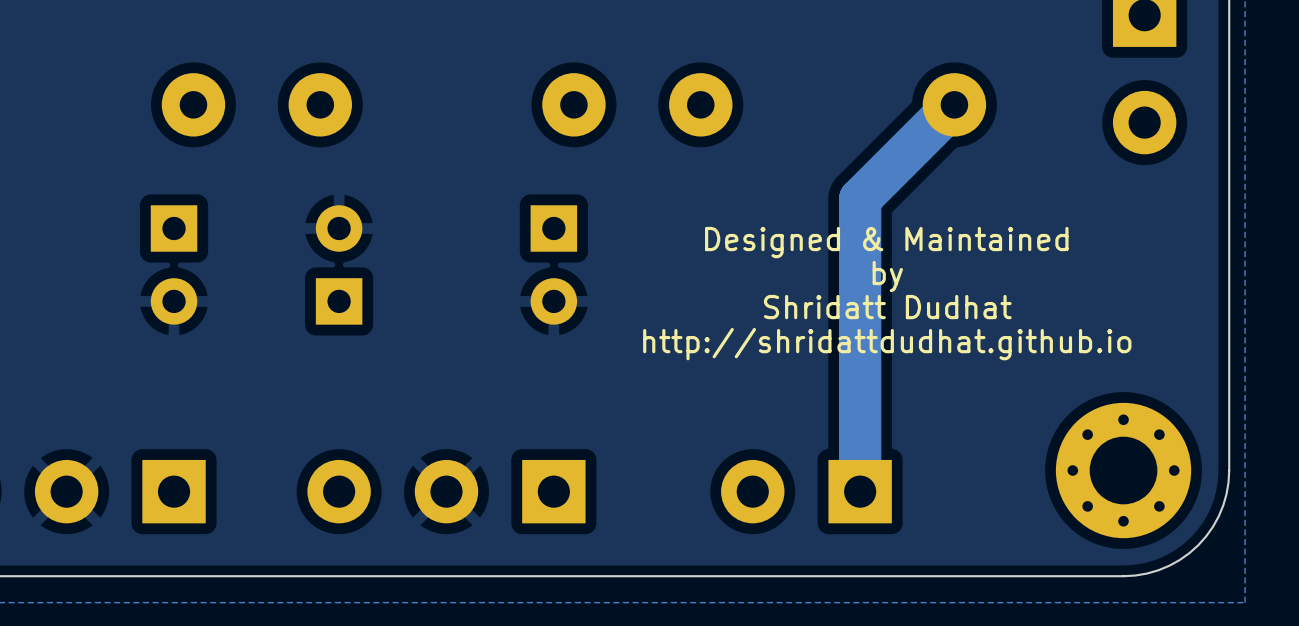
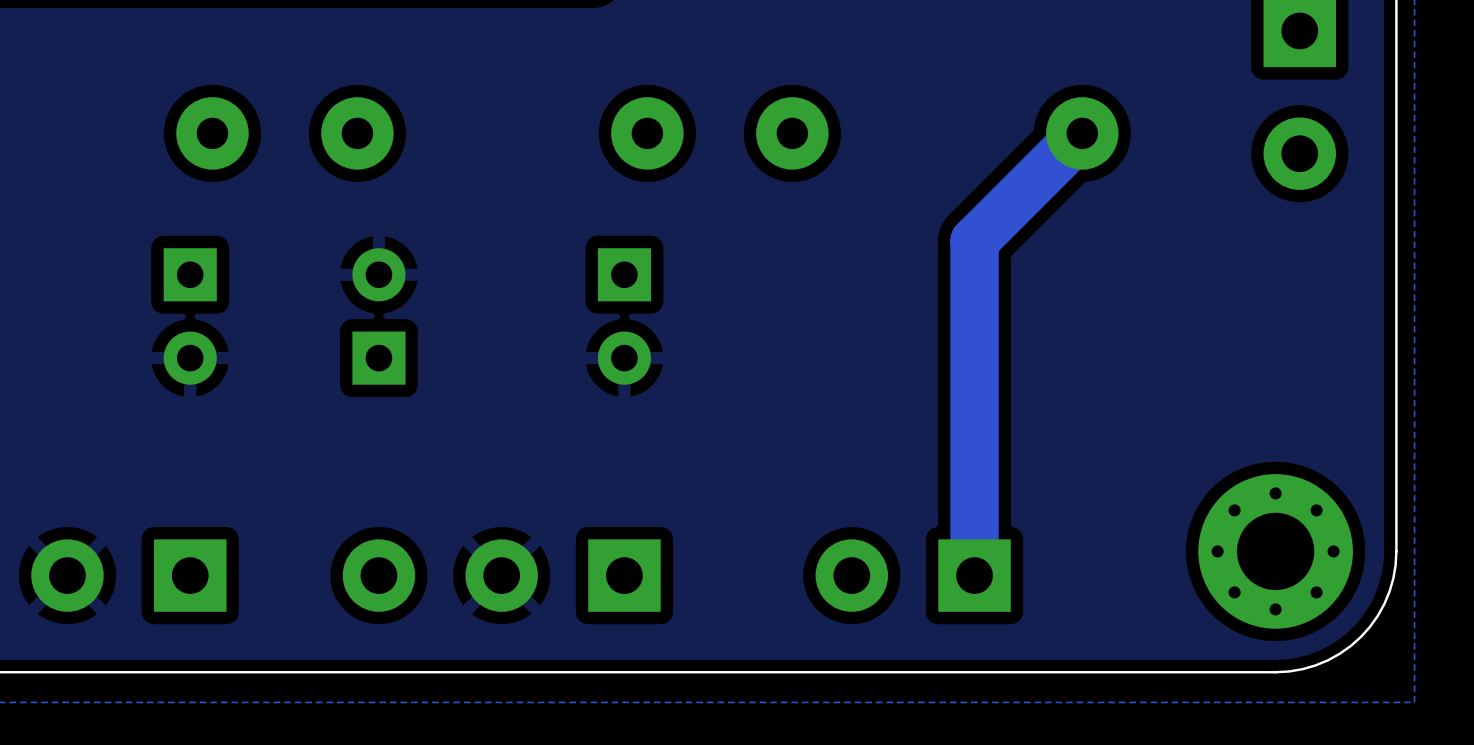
text: Designed & Maintained (886, 242) -> none
text: by (887, 276) -> none
text: Shridatt Dudhat (887, 307) -> none
text: http://shridattdudhat.github.io (887, 344) -> none

